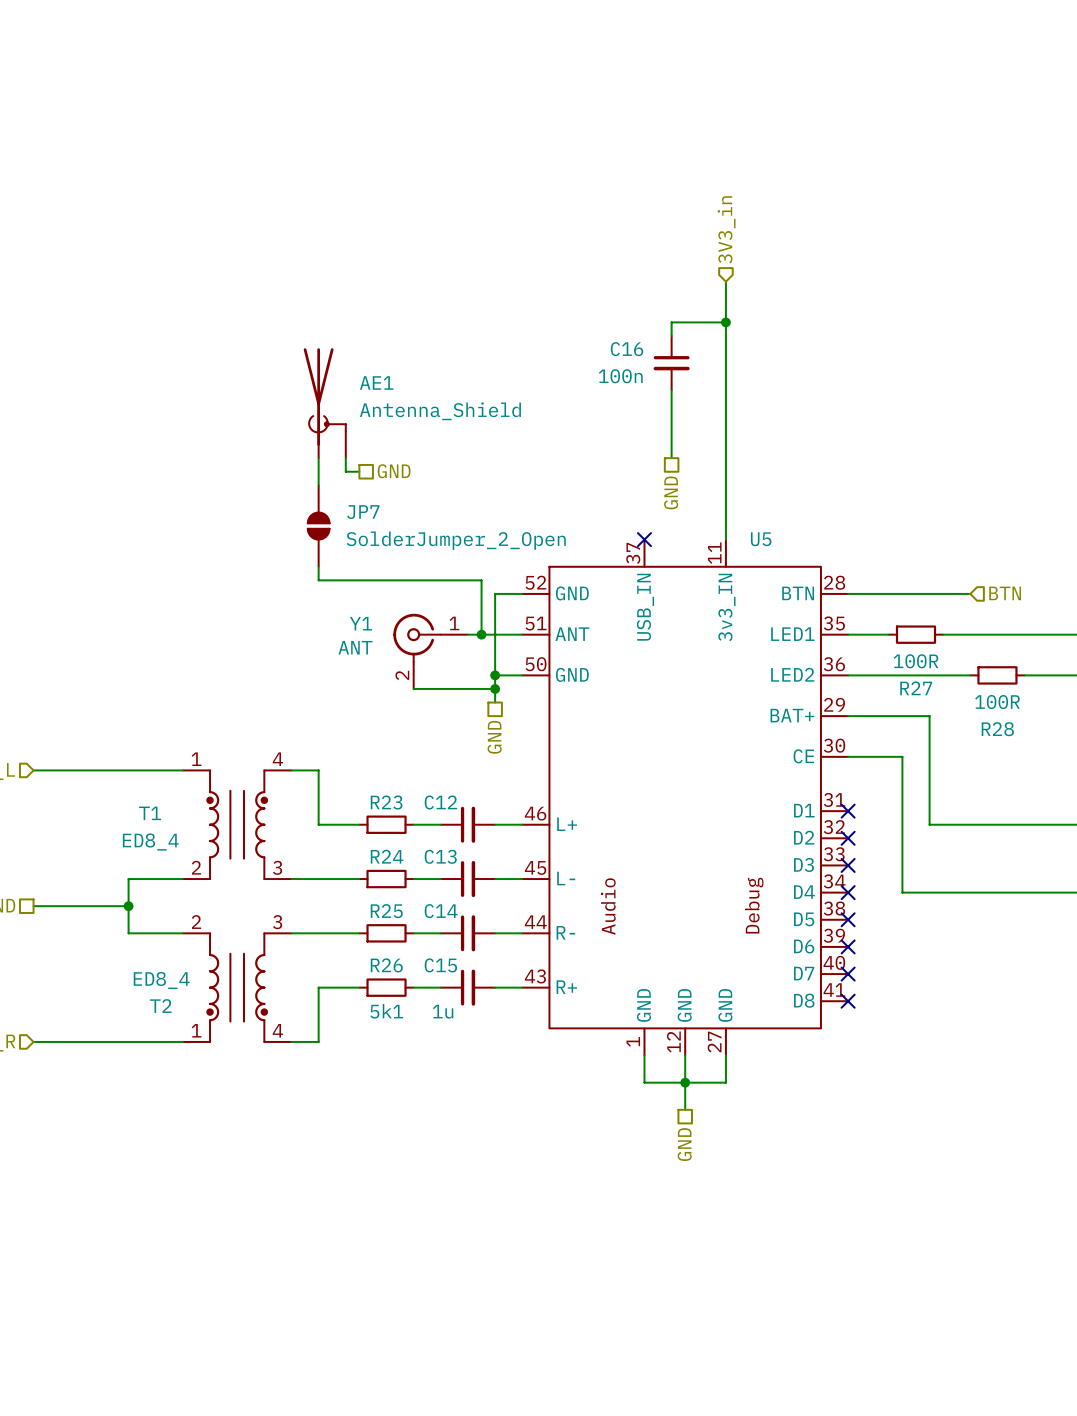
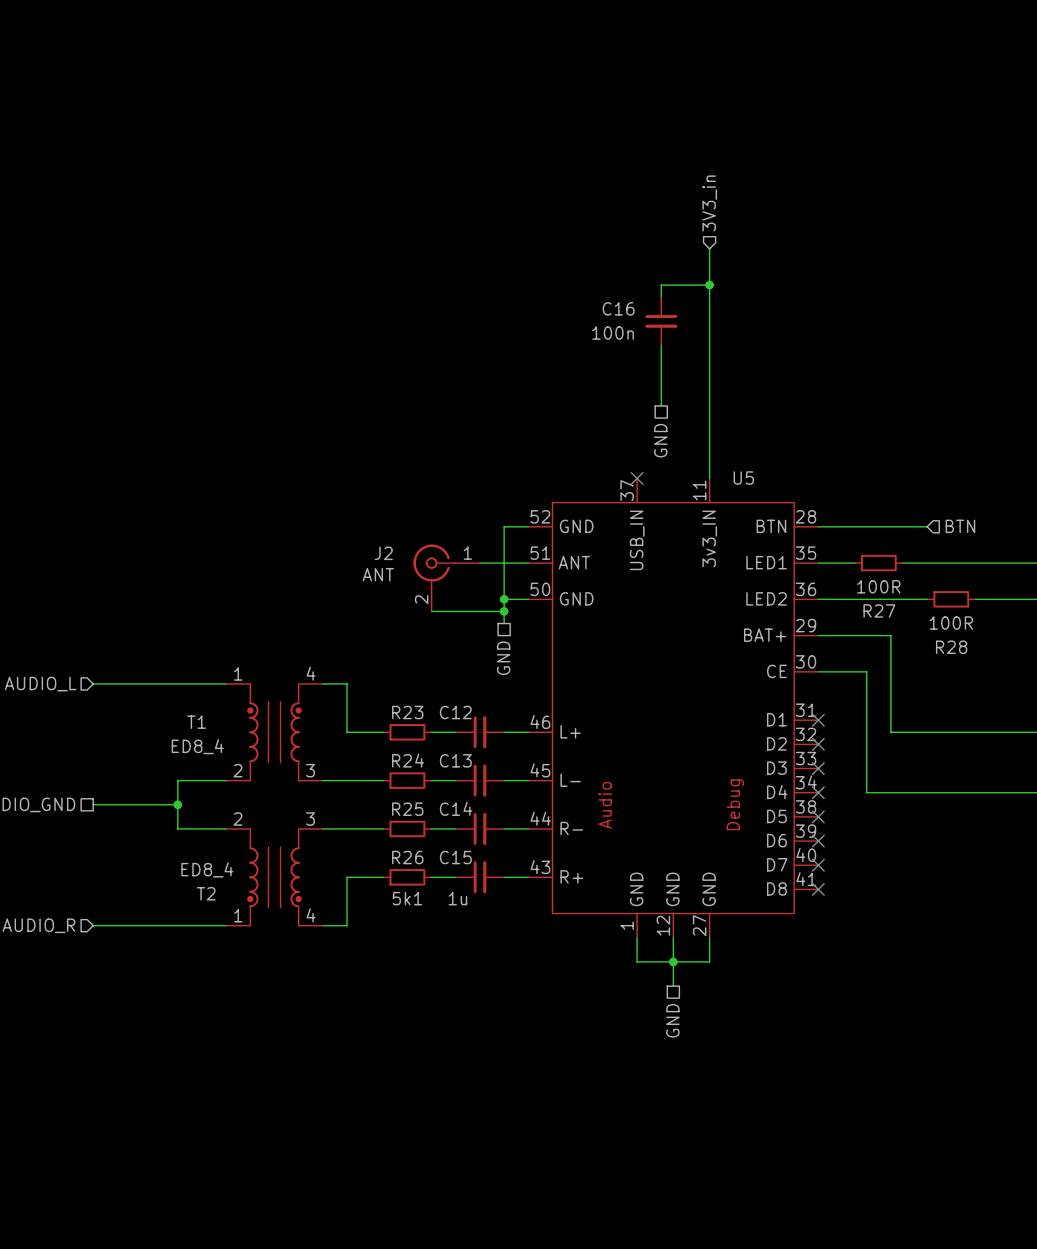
AE1: Antenna_Shield (324, 403) -> none
wire: (318, 458) (318, 485) -> none
wire: (345, 458) (345, 471) (359, 471) -> none
hierarchical label: GND (394, 471) -> none
JP7: SolderJumper_2_Open (318, 526) -> none
wire: (318, 566) (318, 580) (481, 580) (481, 634) -> none
Y1 name: Y1 (360, 623) -> J2 (383, 553)
junction: (481, 634) -> none

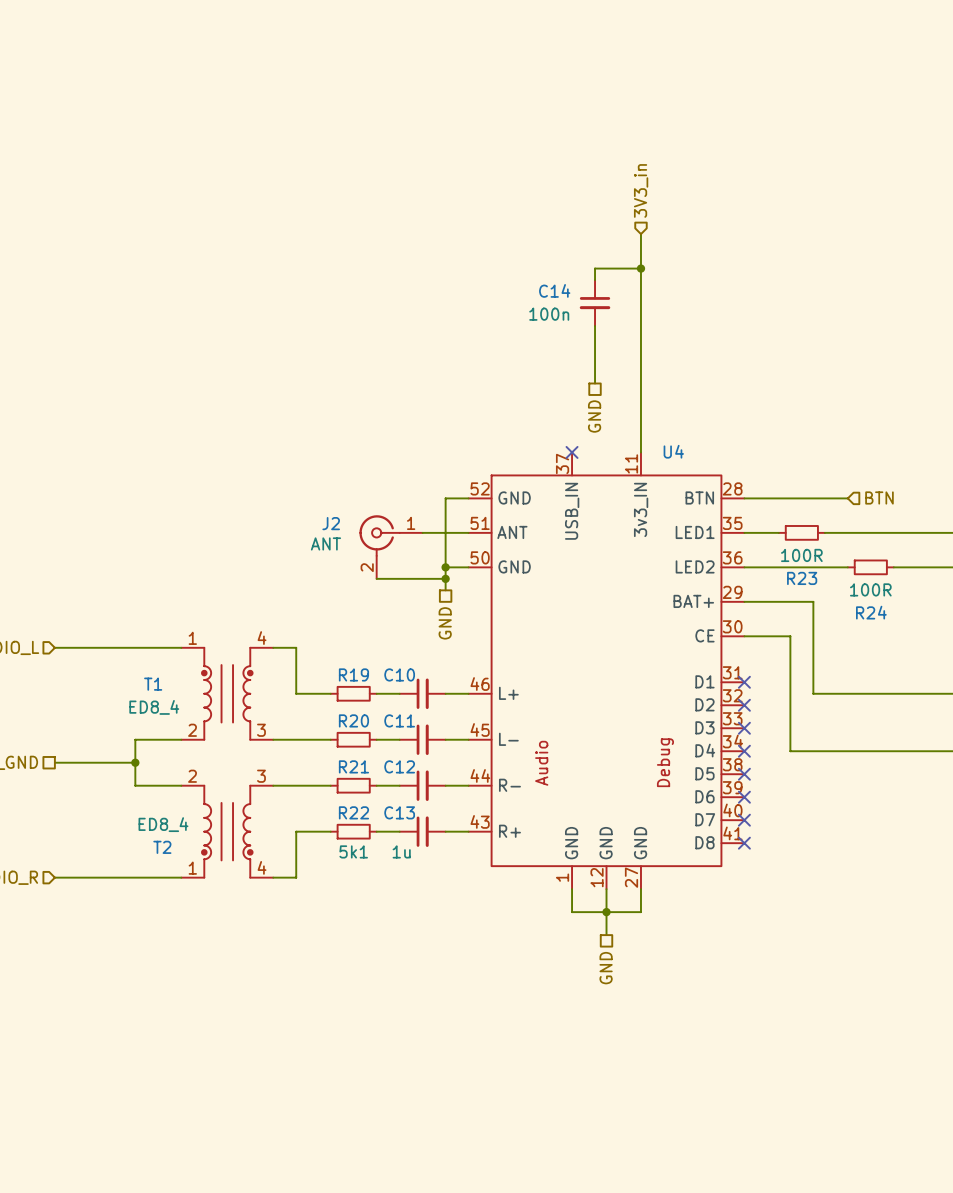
C16 name: C16 (618, 308) -> C14 (554, 290)
U5 name: U5 (743, 478) -> U4 (673, 451)
R27 name: R27 (879, 610) -> R23 (802, 578)
R28 name: R28 (951, 647) -> R24 (871, 612)
R23 name: R23 (407, 712) -> R19 (353, 674)
C12 name: C12 (455, 712) -> C10 (399, 674)
R24 name: R24 (408, 760) -> R20 (353, 720)
C13 name: C13 (455, 760) -> C11 (399, 720)
C14 name: C14 (456, 808) -> C12 (399, 766)
R25 name: R25 (407, 809) -> R21 (353, 766)
R26 name: R26 (407, 857) -> R22 (353, 812)
C15 name: C15 (455, 857) -> C13 (399, 812)

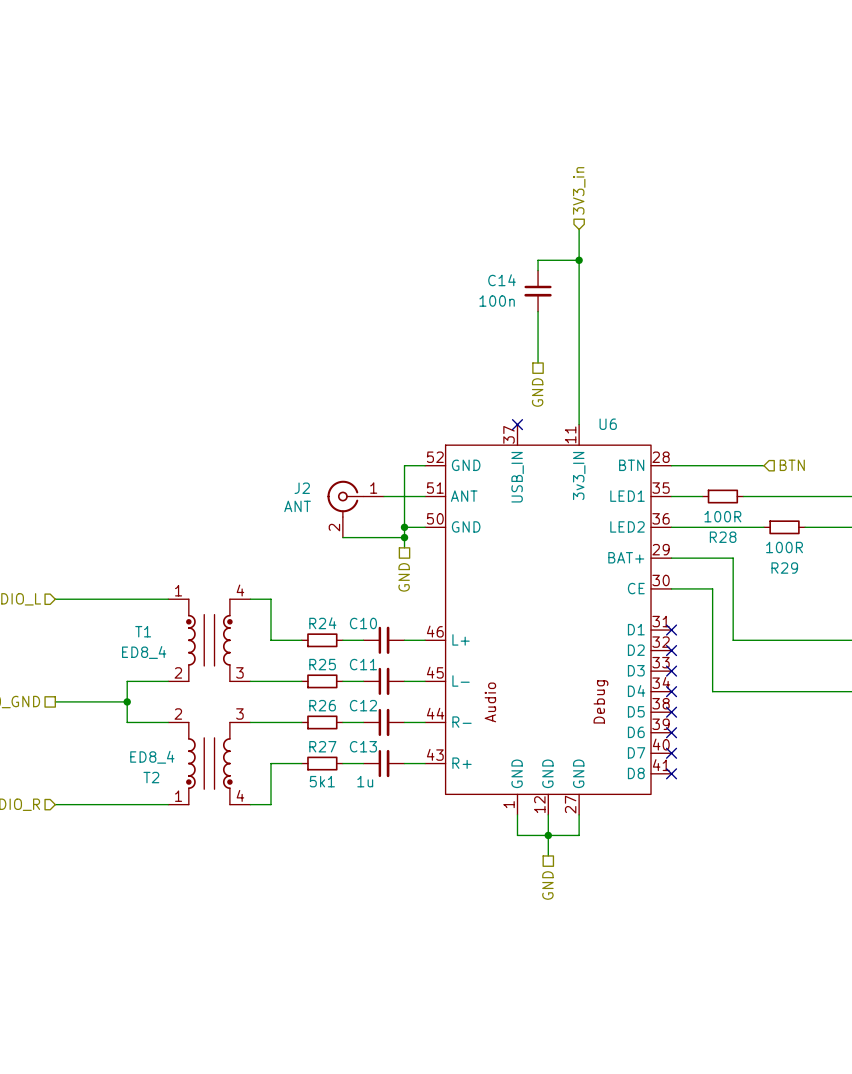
U4 name: U4 (673, 451) -> U6 (608, 424)
R23 name: R23 (802, 578) -> R28 (723, 537)
R24 name: R24 (871, 612) -> R29 (784, 568)
R19 name: R19 (353, 674) -> R24 (322, 623)
R20 name: R20 (353, 720) -> R25 (322, 664)
R21 name: R21 (353, 766) -> R26 (322, 705)
R22 name: R22 (353, 812) -> R27 (322, 746)

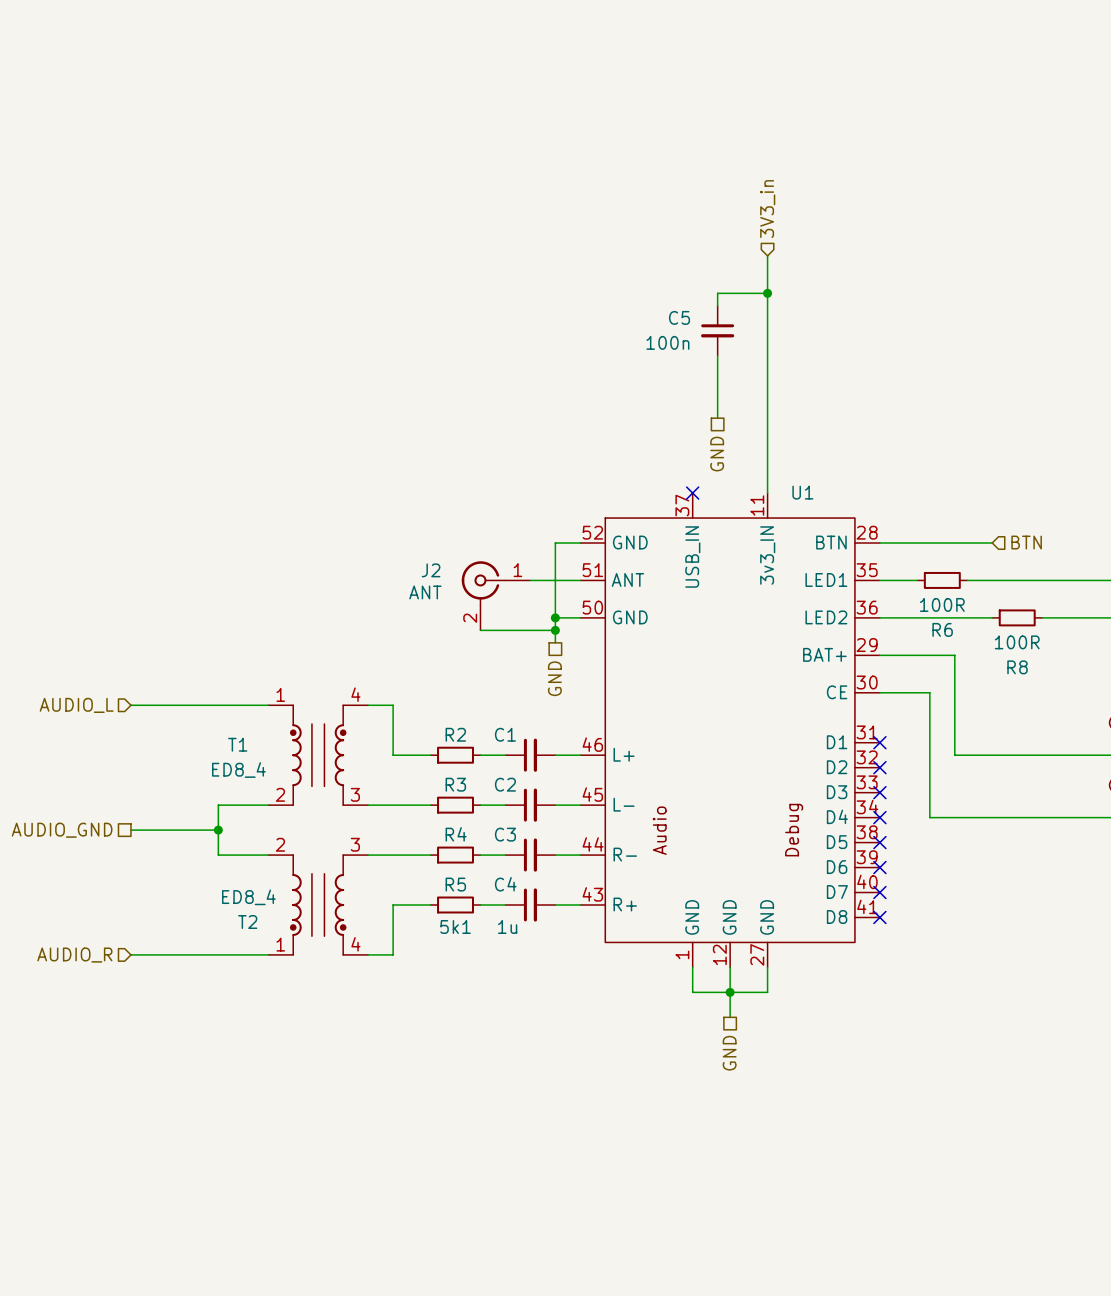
C14 name: C14 (502, 280) -> C5 (679, 317)
U6 name: U6 (608, 424) -> U1 (802, 492)
R28 name: R28 (723, 537) -> R6 (942, 629)
R29 name: R29 (784, 568) -> R8 (1017, 667)
R24 name: R24 (322, 623) -> R2 (455, 734)
C10 name: C10 (363, 623) -> C1 (505, 734)
R25 name: R25 (322, 664) -> R3 (455, 784)
C11 name: C11 (363, 664) -> C2 (505, 784)
R26 name: R26 (322, 705) -> R4 (456, 834)
C12 name: C12 (363, 705) -> C3 (505, 834)
R27 name: R27 (322, 746) -> R5 (455, 884)
C13 name: C13 (363, 746) -> C4 (505, 884)

